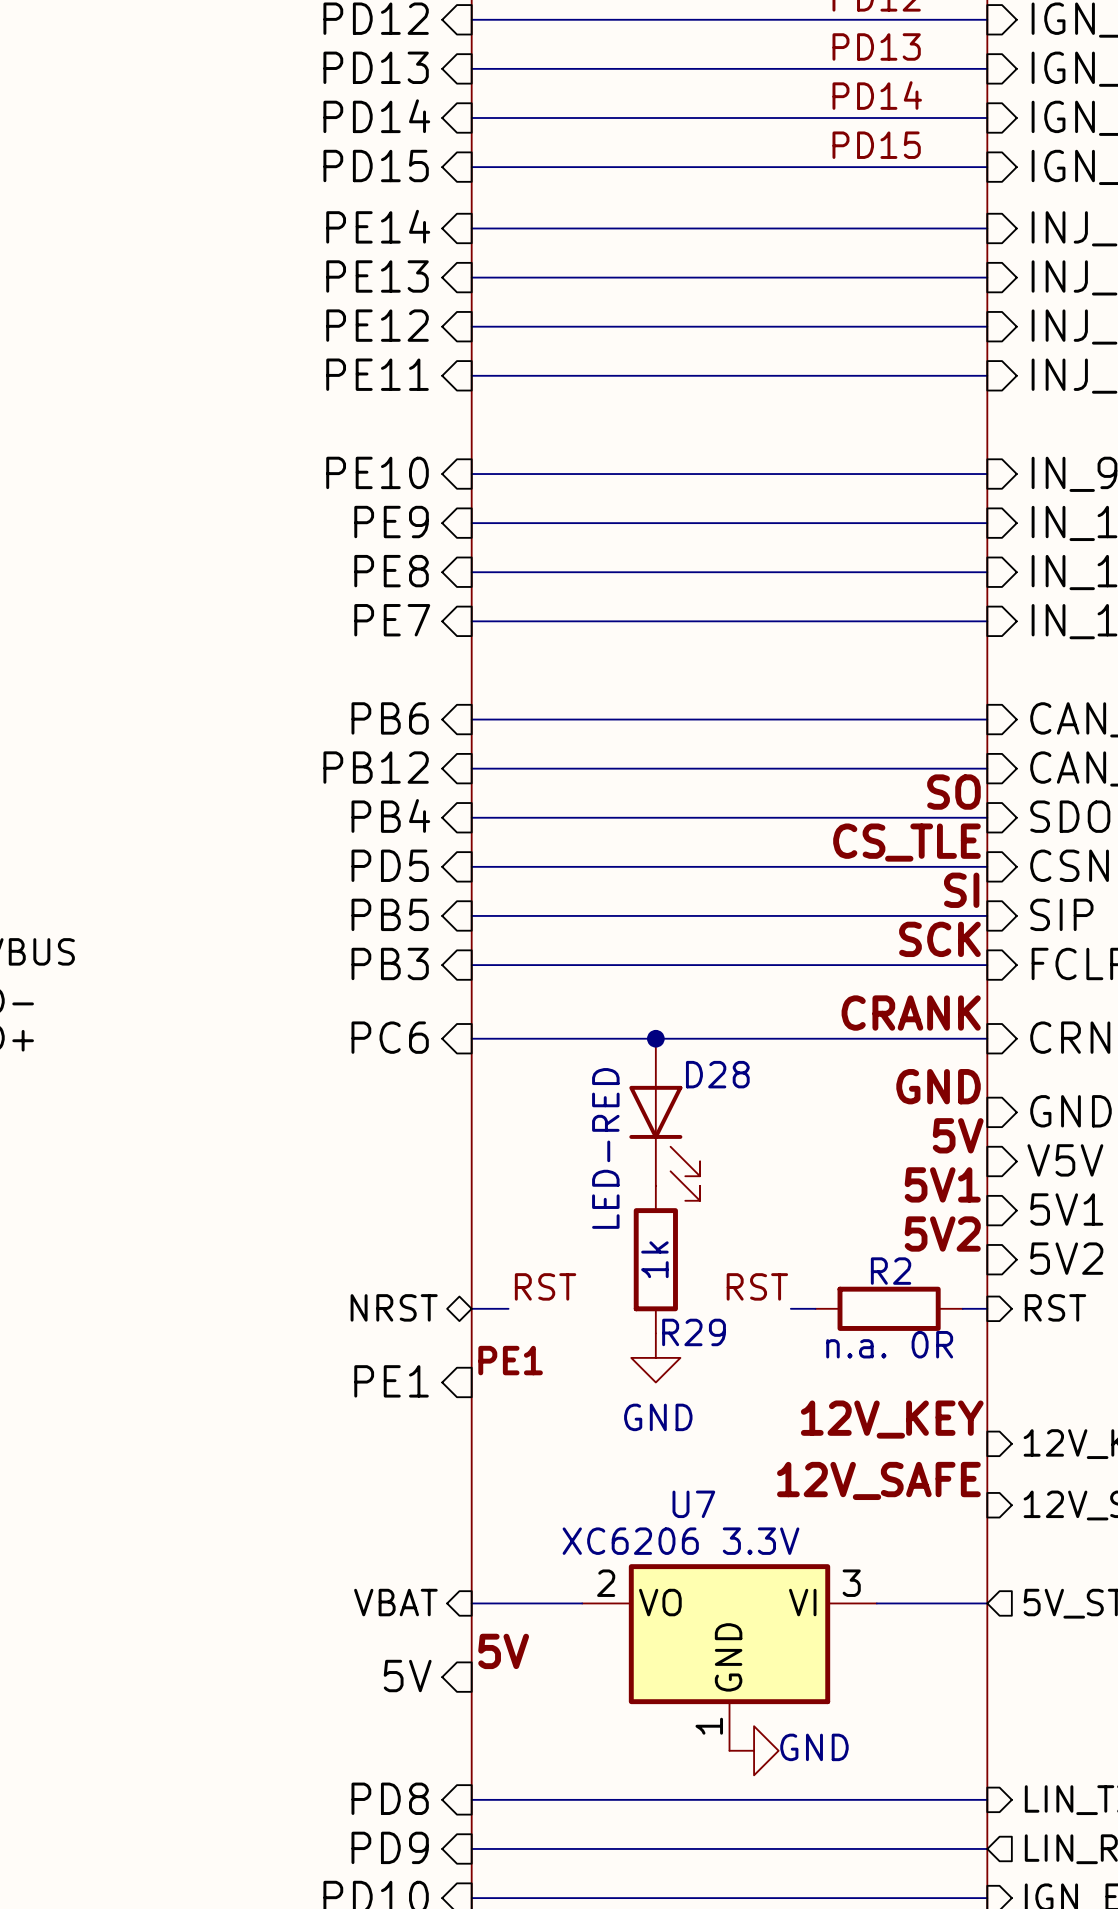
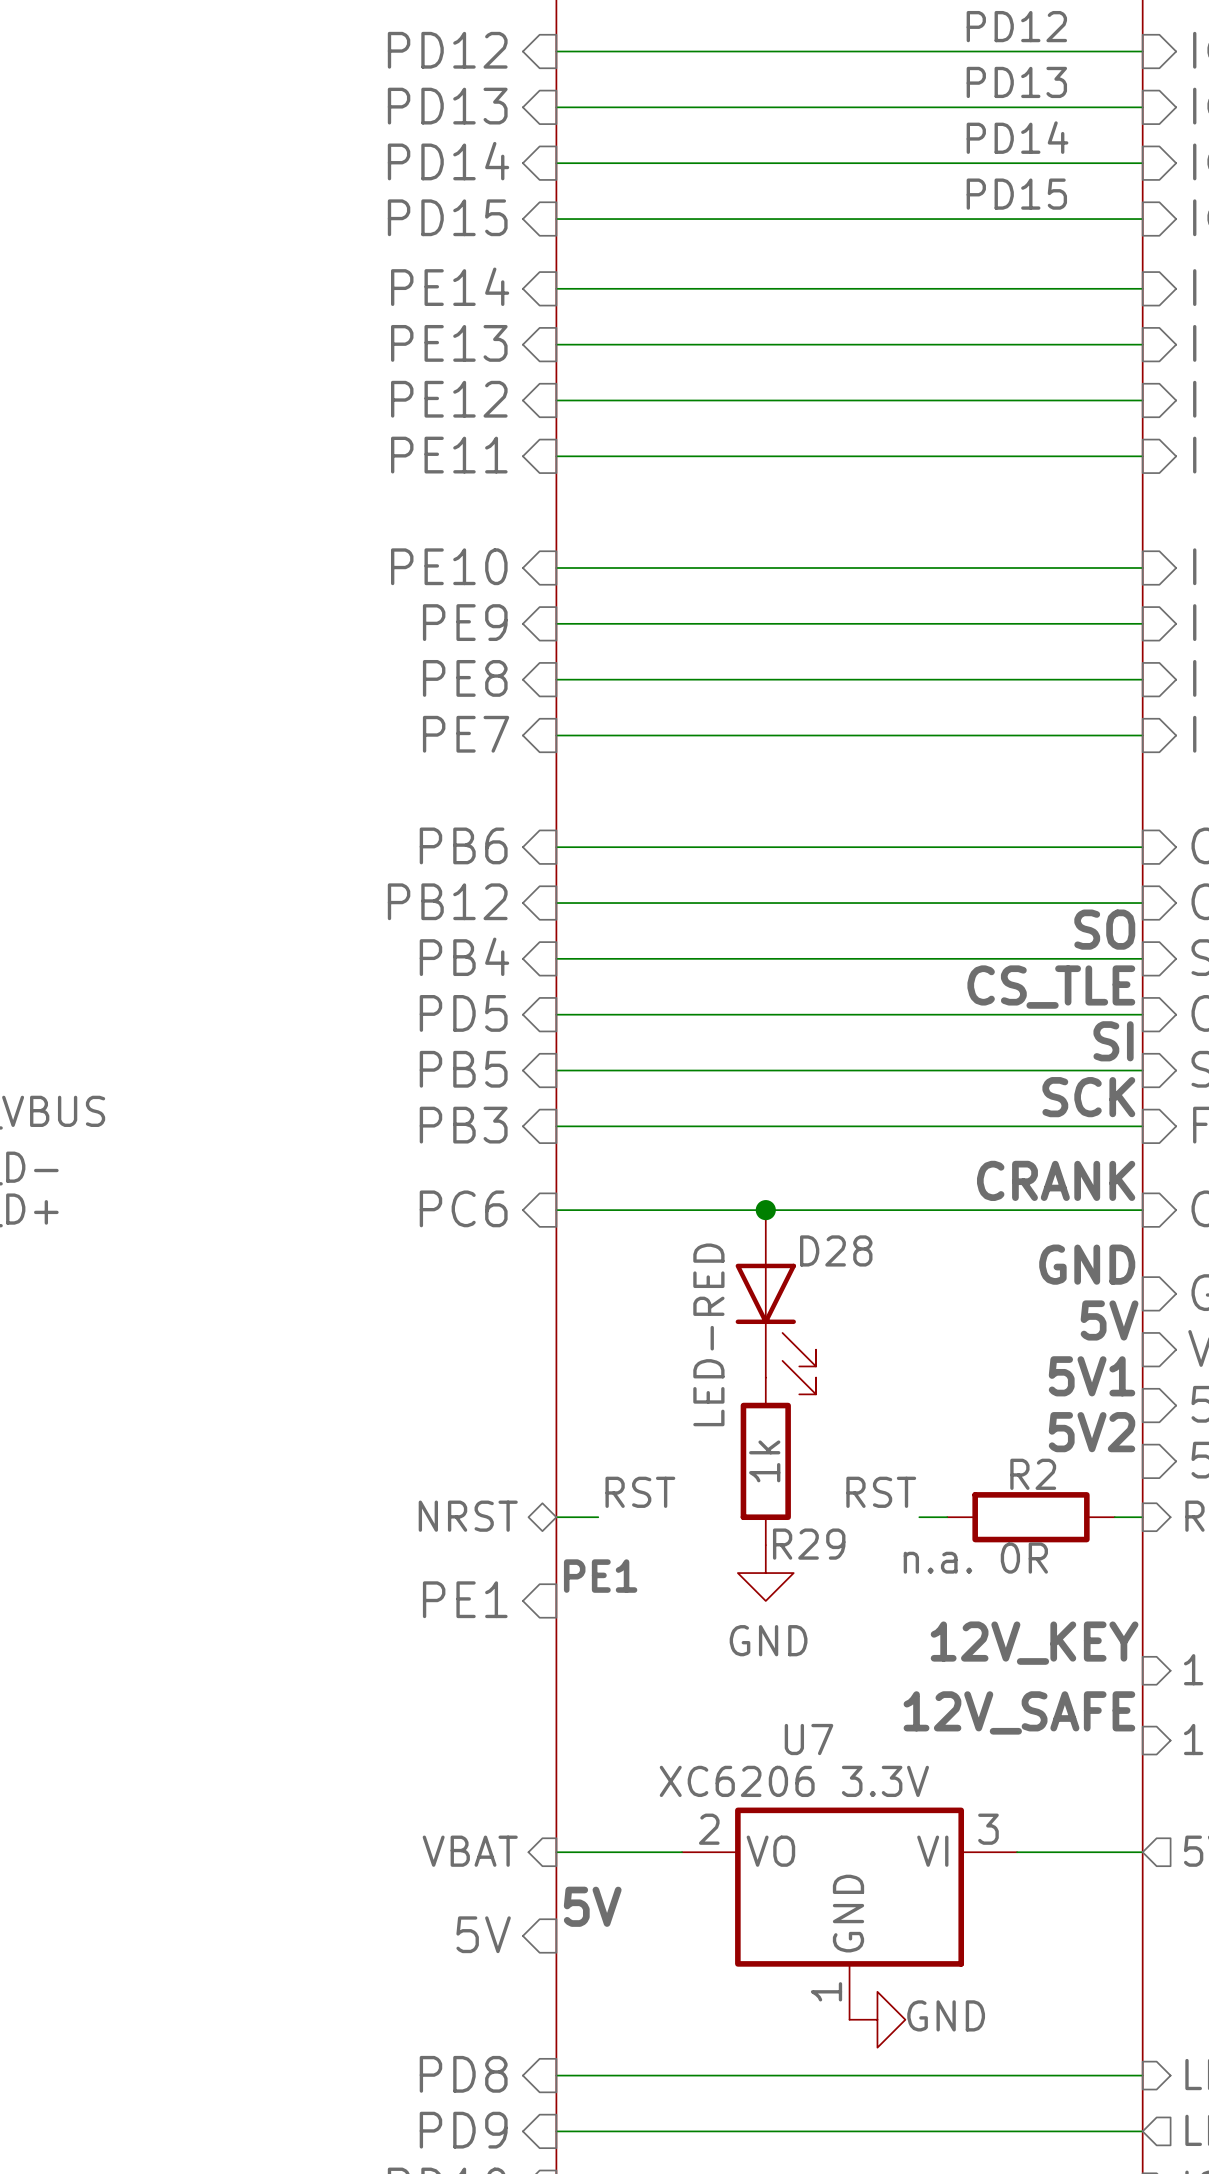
R2 value position: n.a. 0R (889, 1344) -> n.a. 0R (975, 1558)

